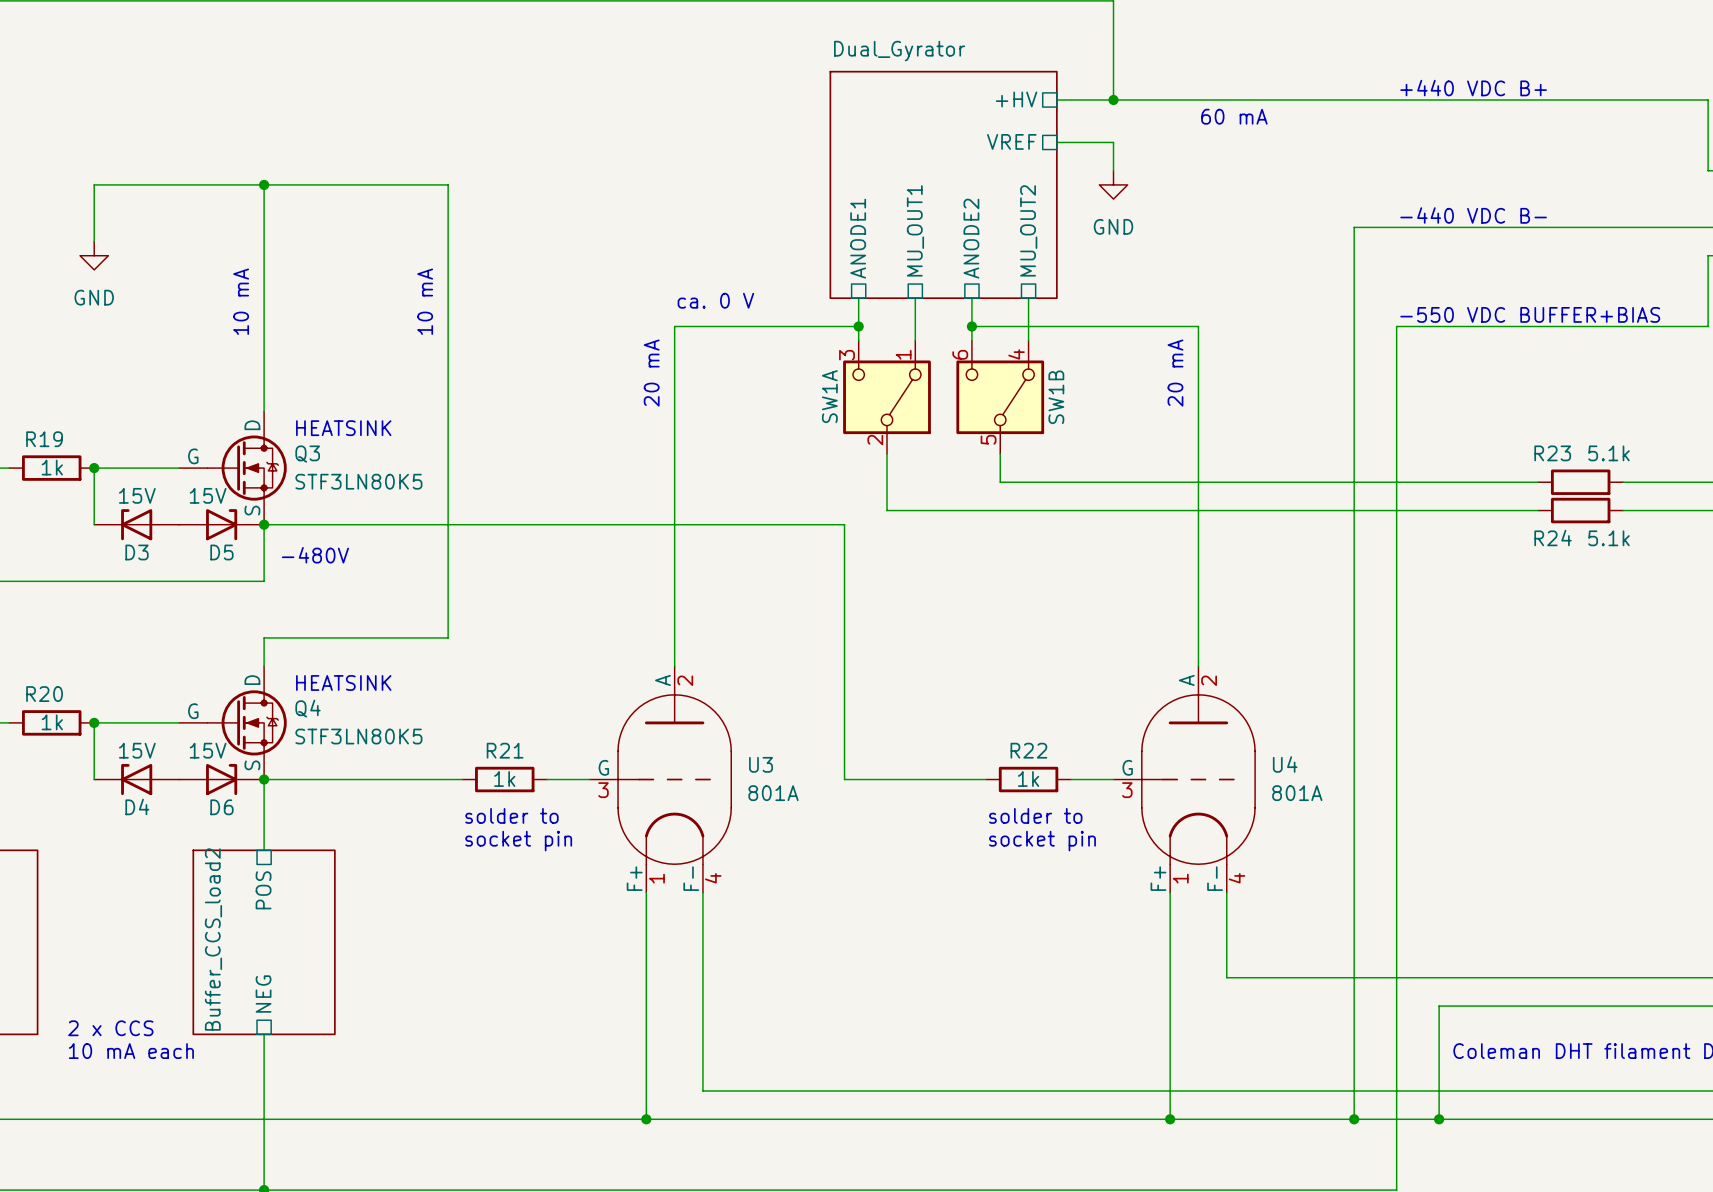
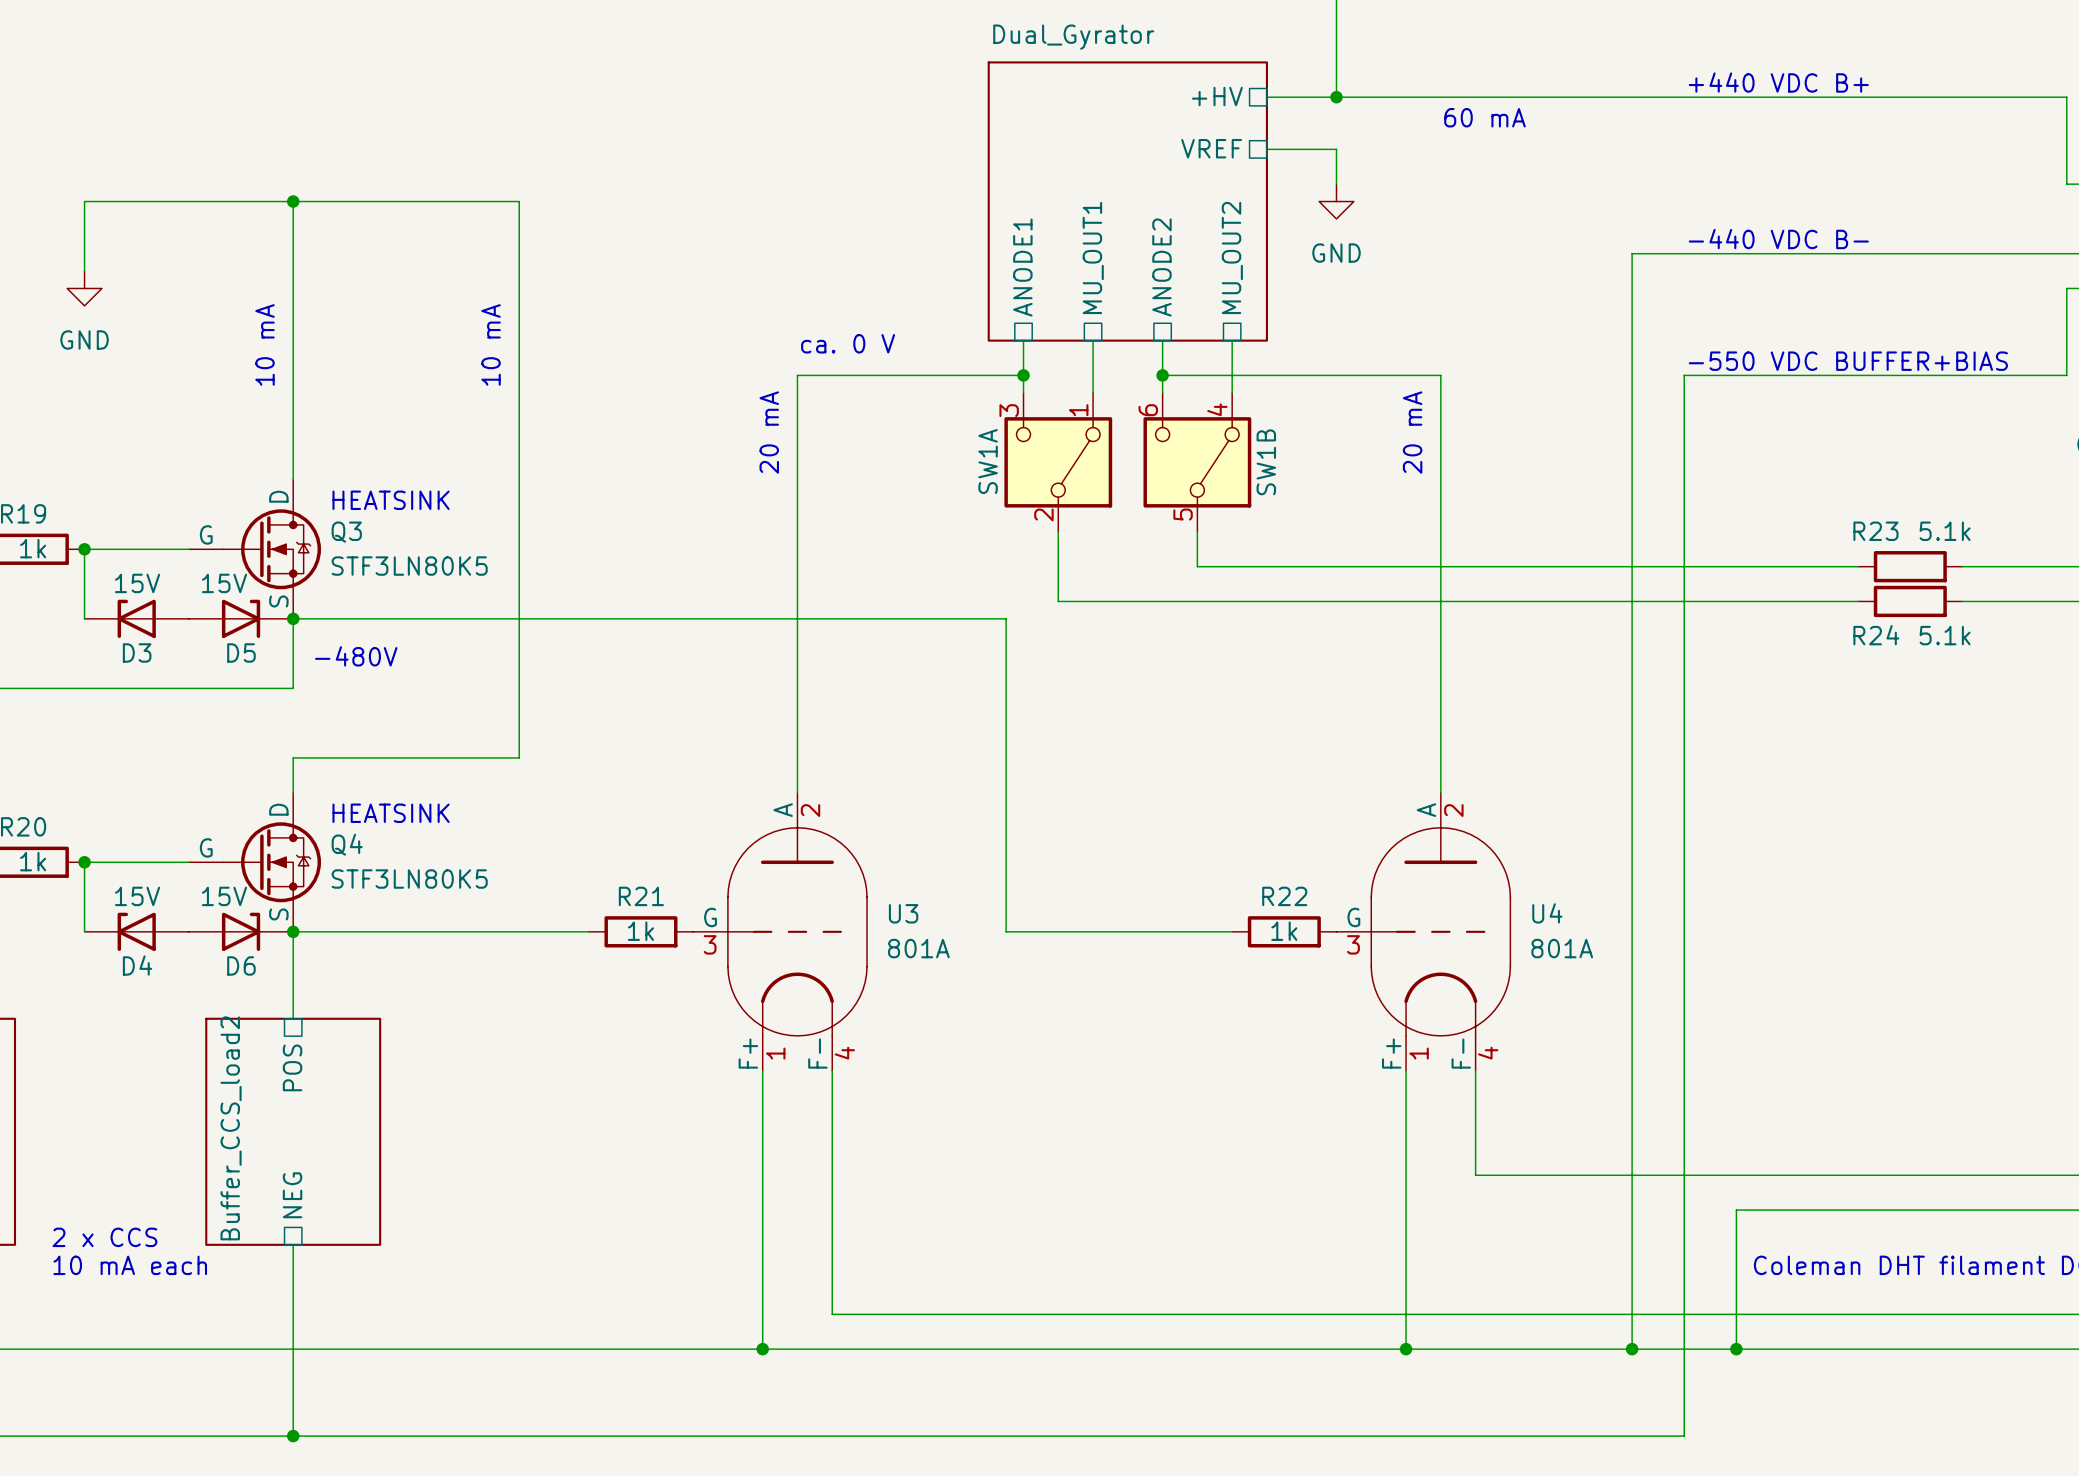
R21 position: (504, 779) -> (640, 931)
wire: (547, 779) (589, 779) -> (536, 931) (588, 931)
R22 position: (1028, 779) -> (1284, 931)
wire: (1071, 779) (1113, 779) -> (1180, 931) (1232, 931)
text: solder to (511, 815) -> none
text: solder to (1035, 815) -> none
text: socket pin (518, 841) -> none
text: socket pin (1042, 841) -> none

